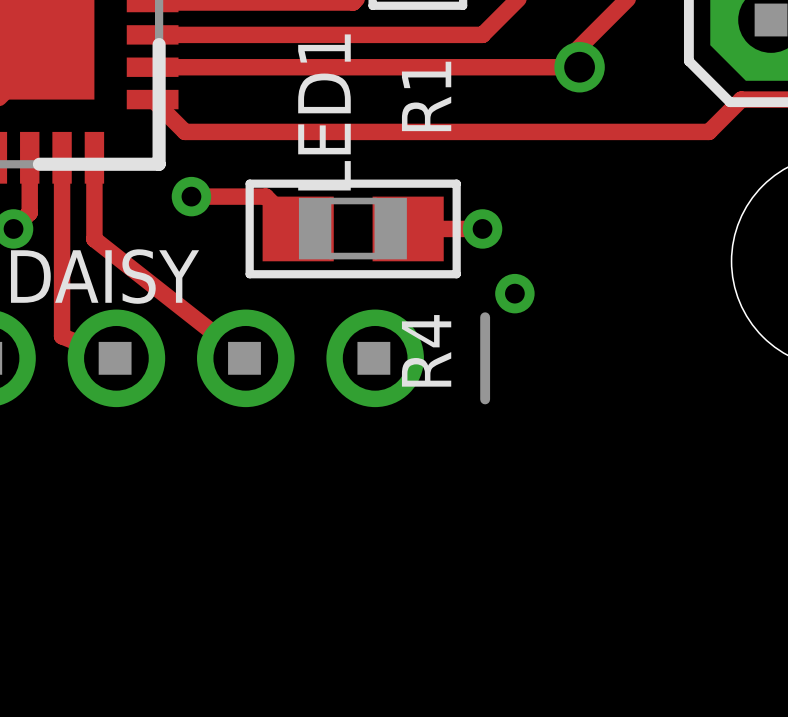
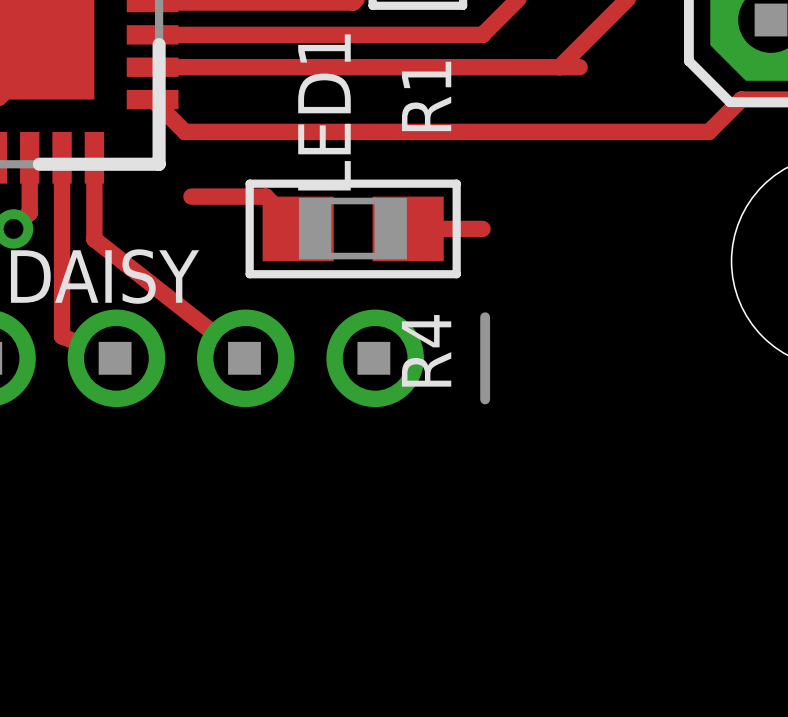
via: (579, 67) -> none
via: (191, 196) -> none
via: (482, 228) -> none
via: (514, 293) -> none

